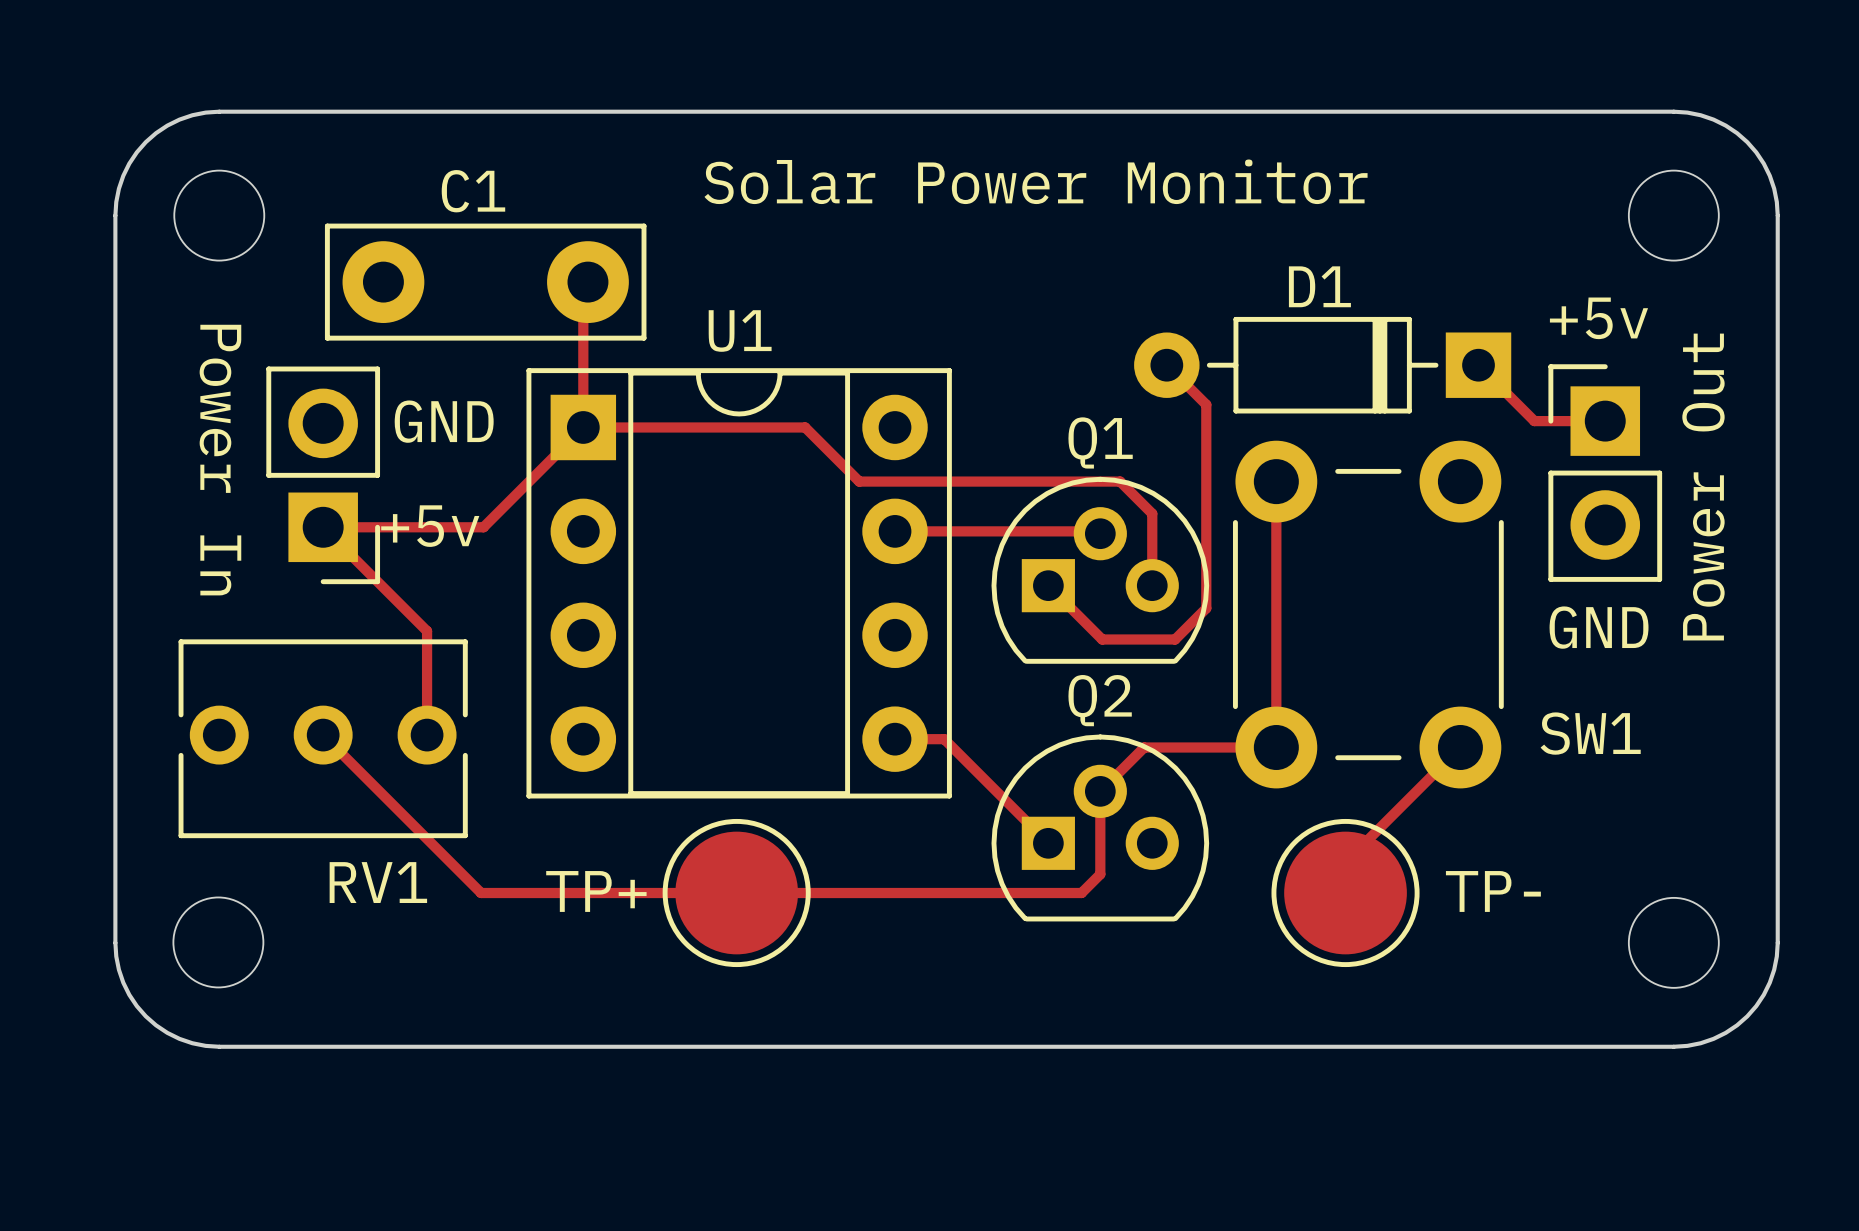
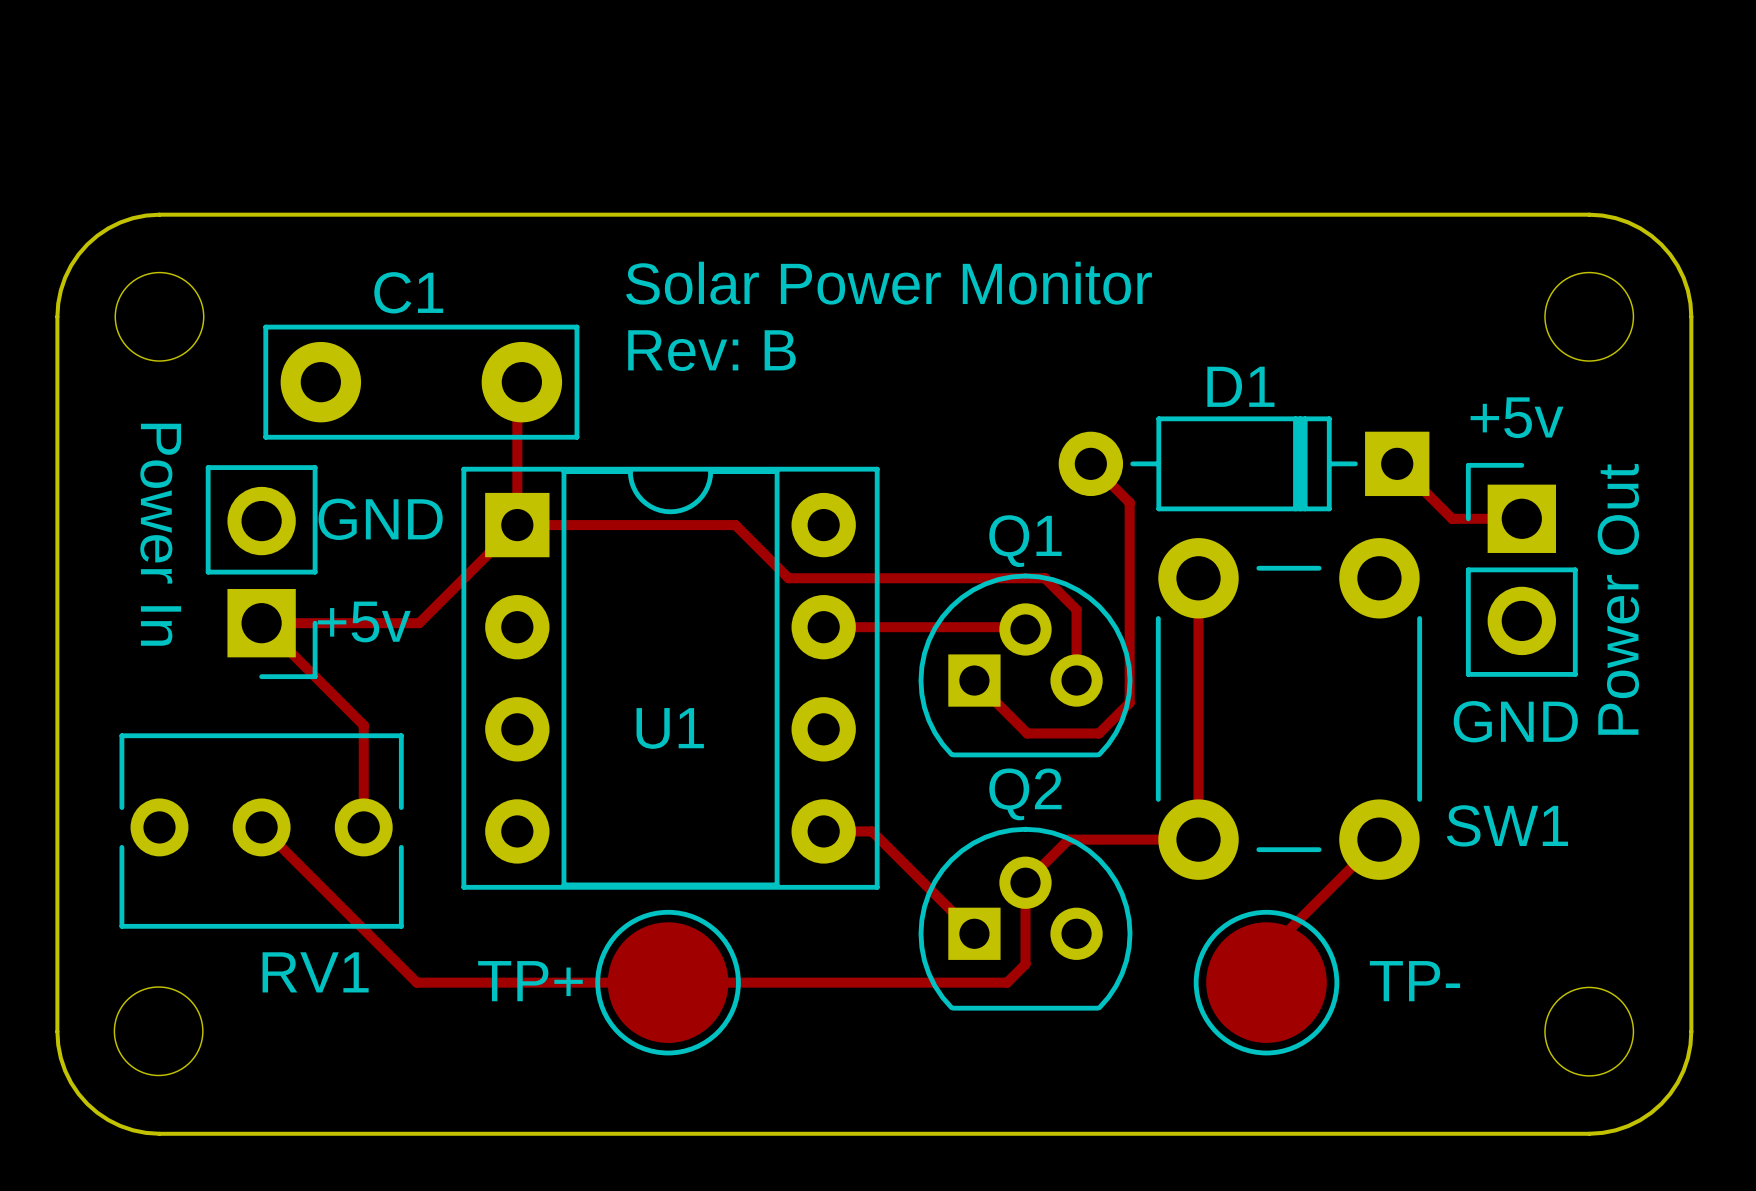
text position: Solar Power Monitor (1036, 181) -> Solar Power Monitor (888, 283)
text: none -> Rev: B (711, 350)
U1 name position: U1 (740, 331) -> U1 (670, 728)

